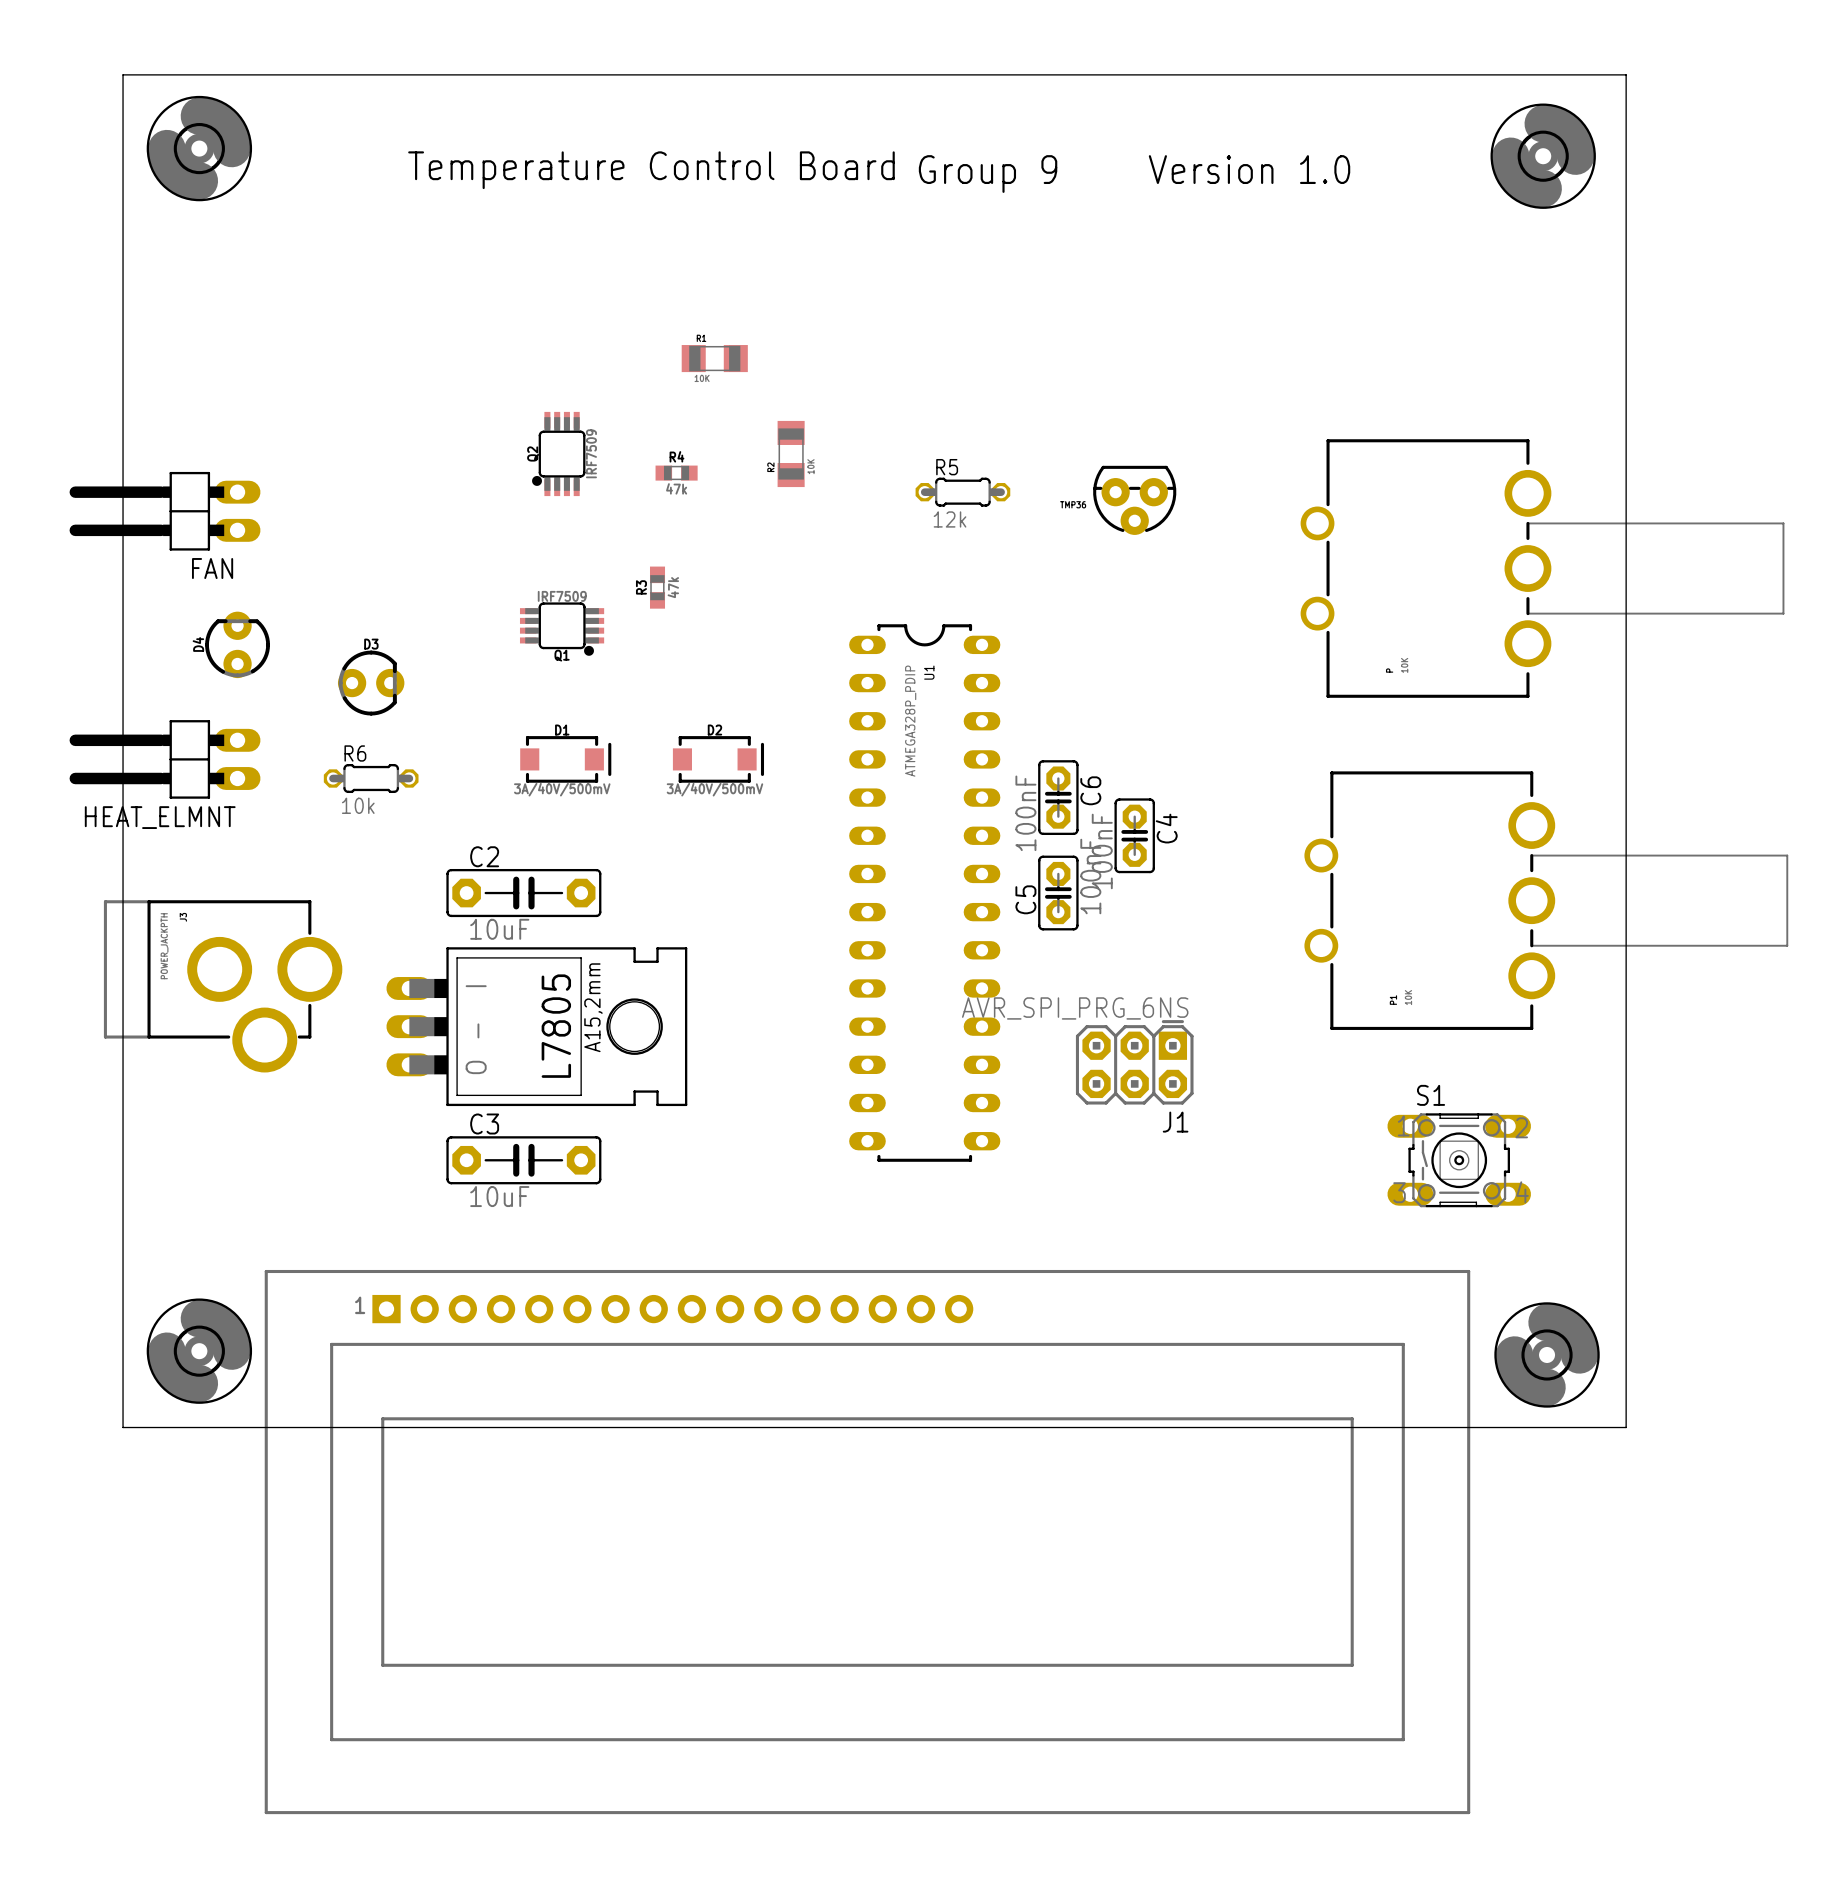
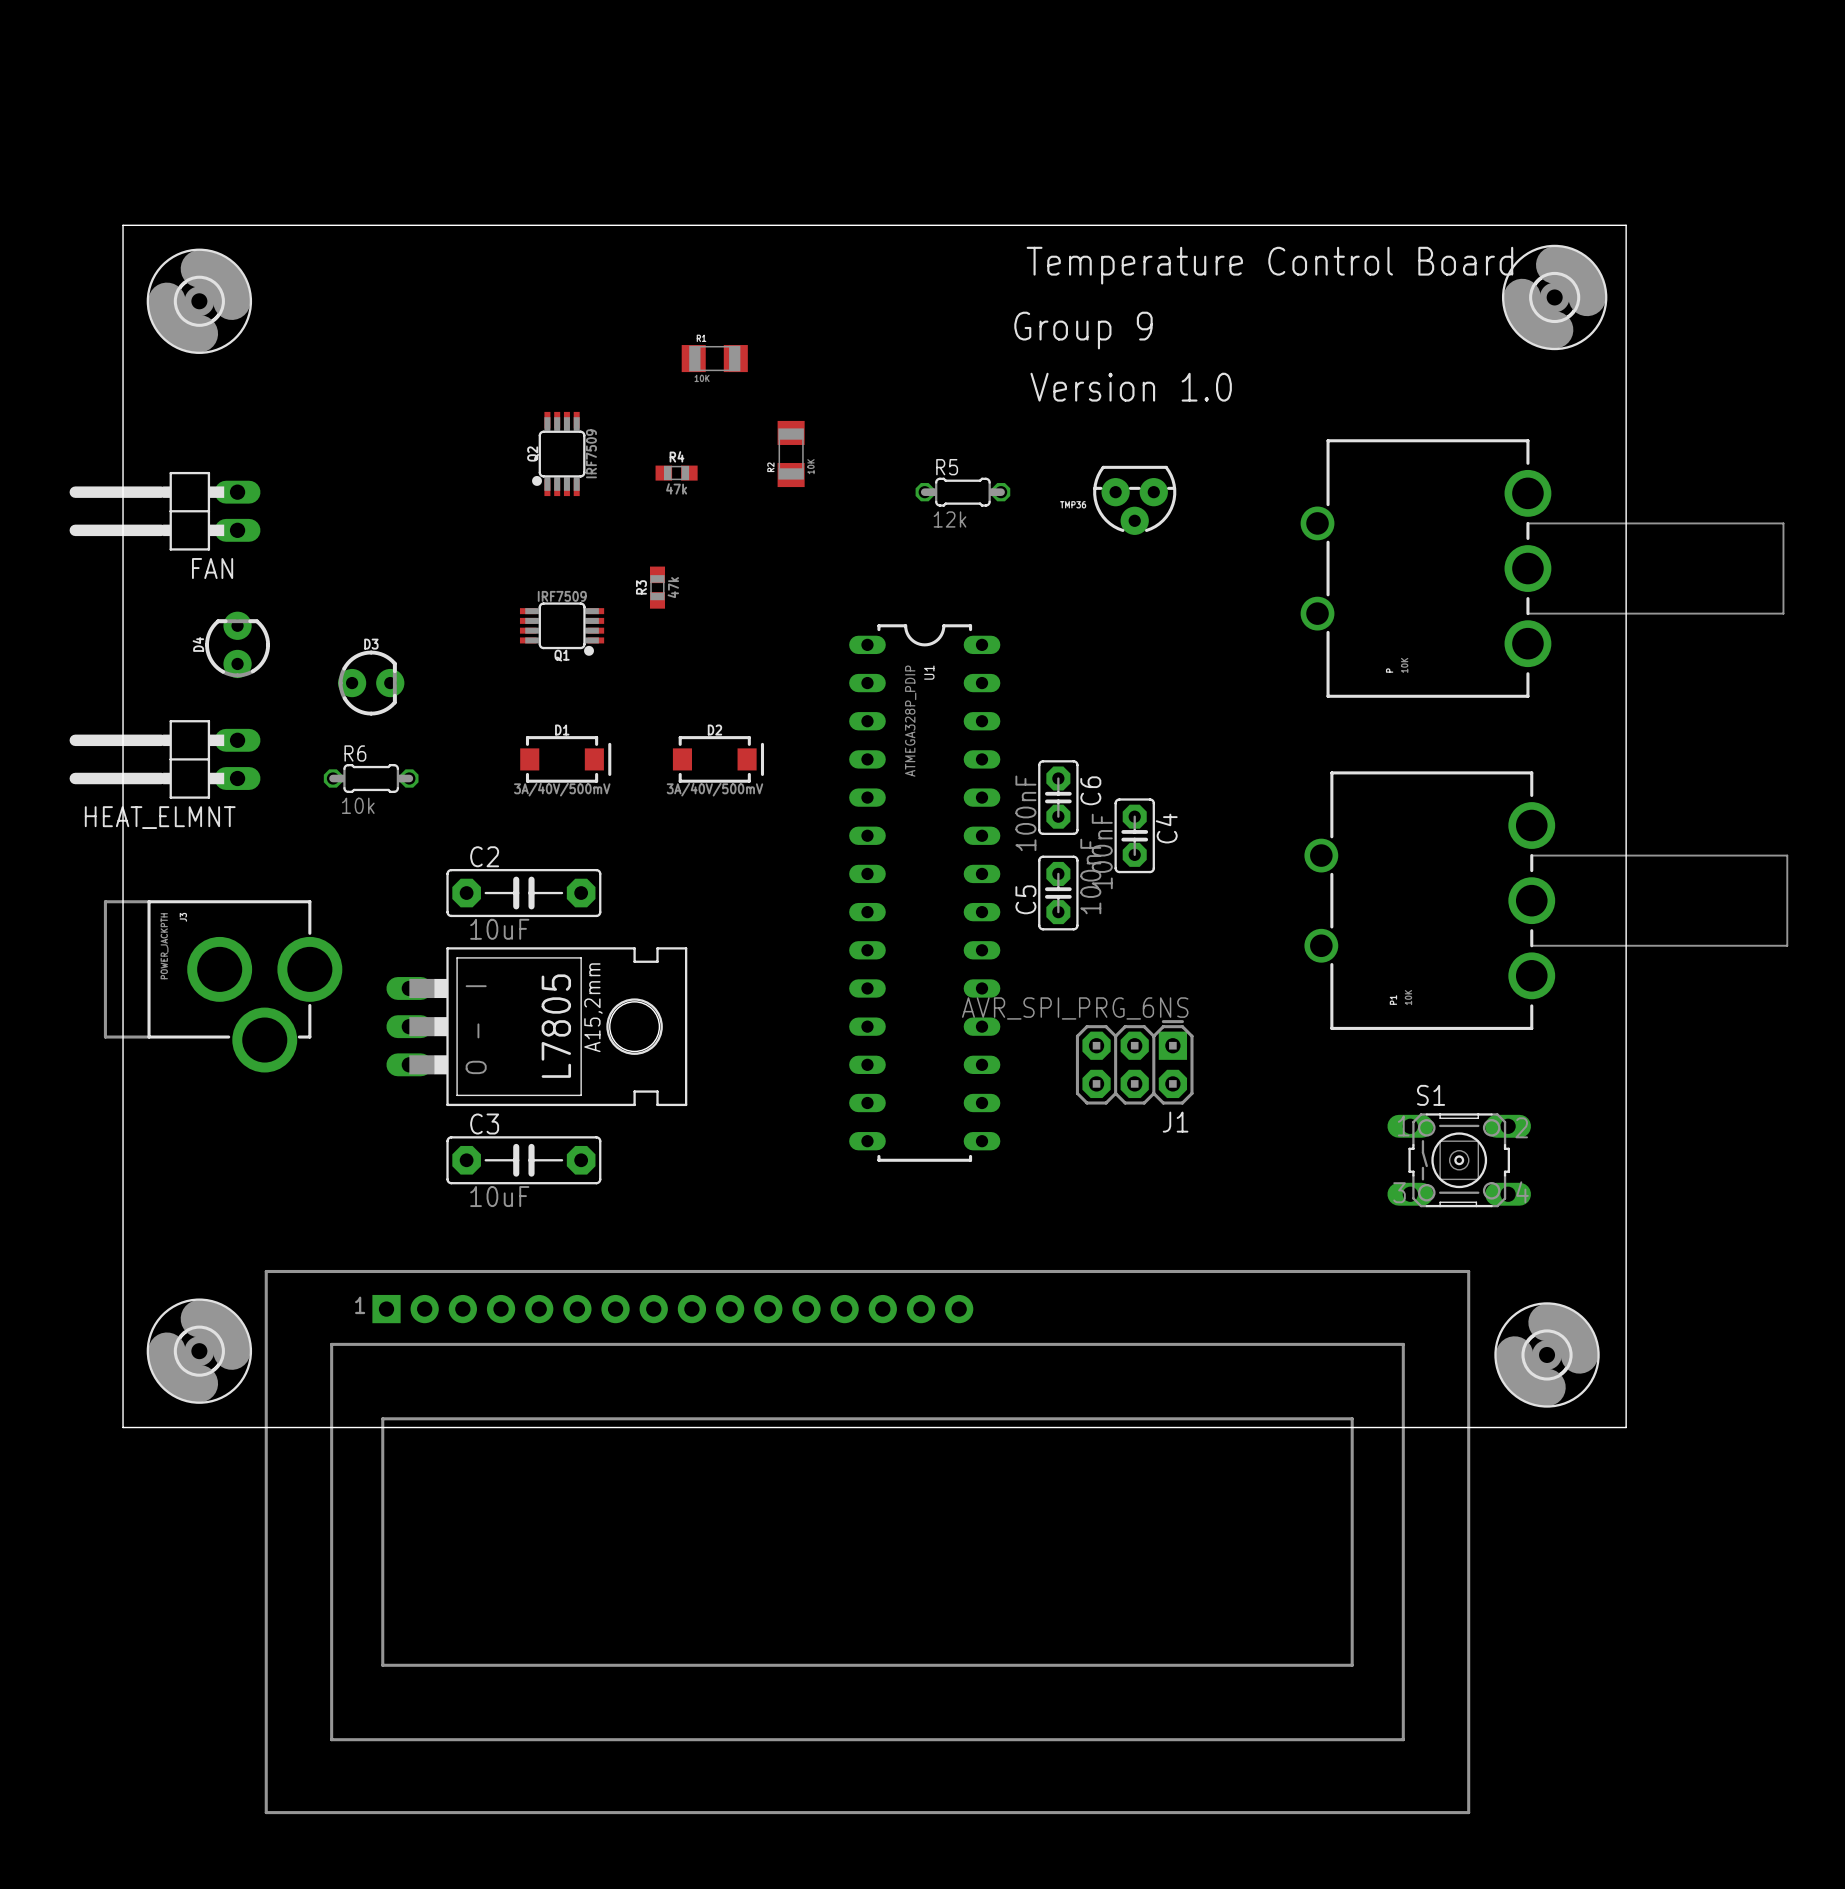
part position: (199, 148) -> (199, 301)
part position: (1543, 156) -> (1554, 297)
text position: Version 1.0 (1249, 169) -> Version 1.0 (1131, 387)
text: Temperature Control Board (651, 170) -> none
text position: Group 9 (988, 174) -> Group 9 (1083, 330)
board edge: (123, 225) (123, 74) (1626, 74) (1626, 225) -> (123, 225) (1626, 225)
text: none -> Temperature Control Board (1269, 265)

